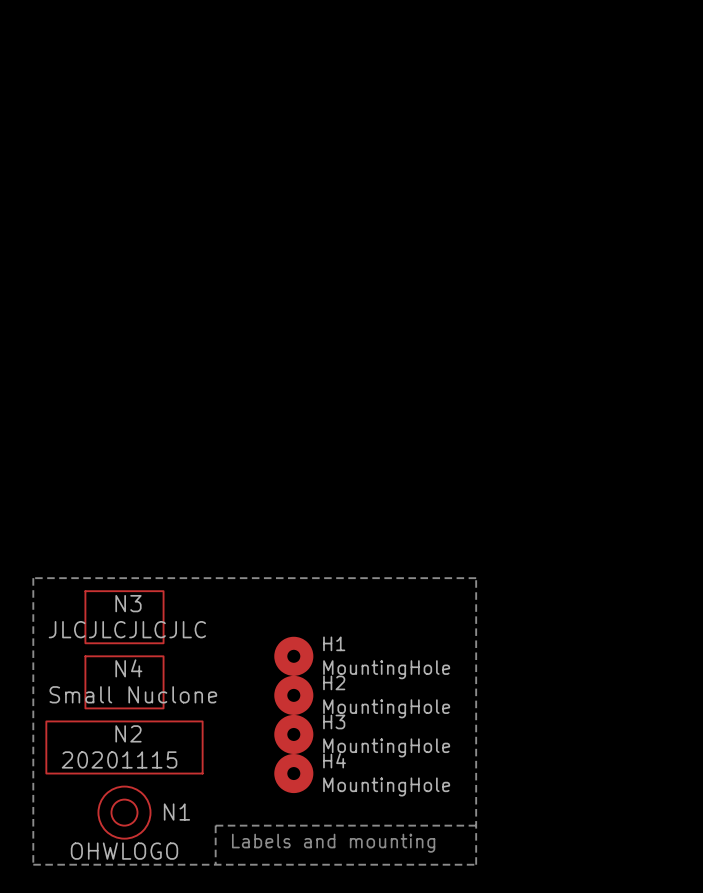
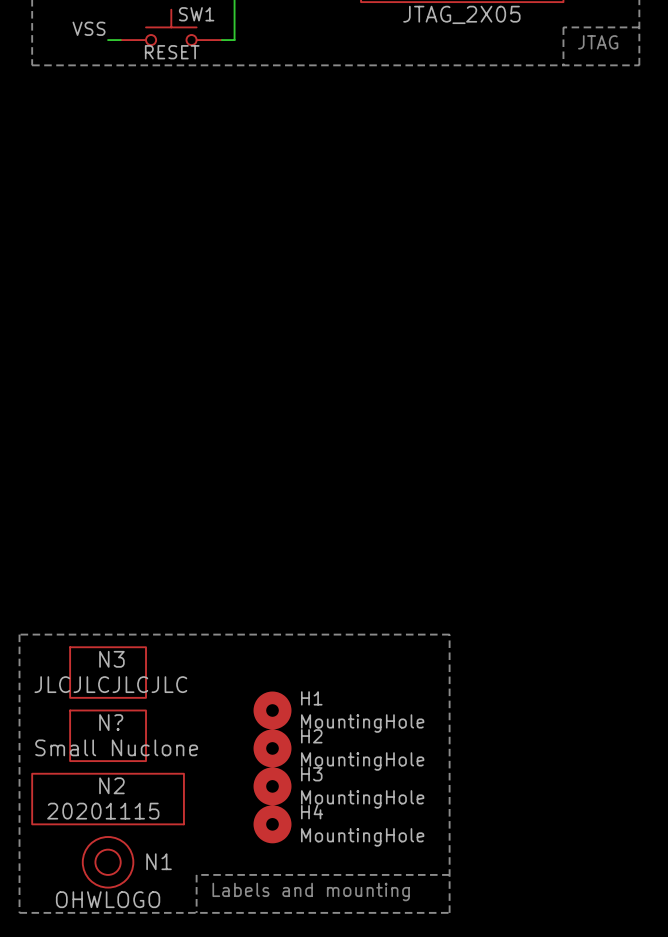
N4 name: N4 (128, 668) -> N? (111, 722)

